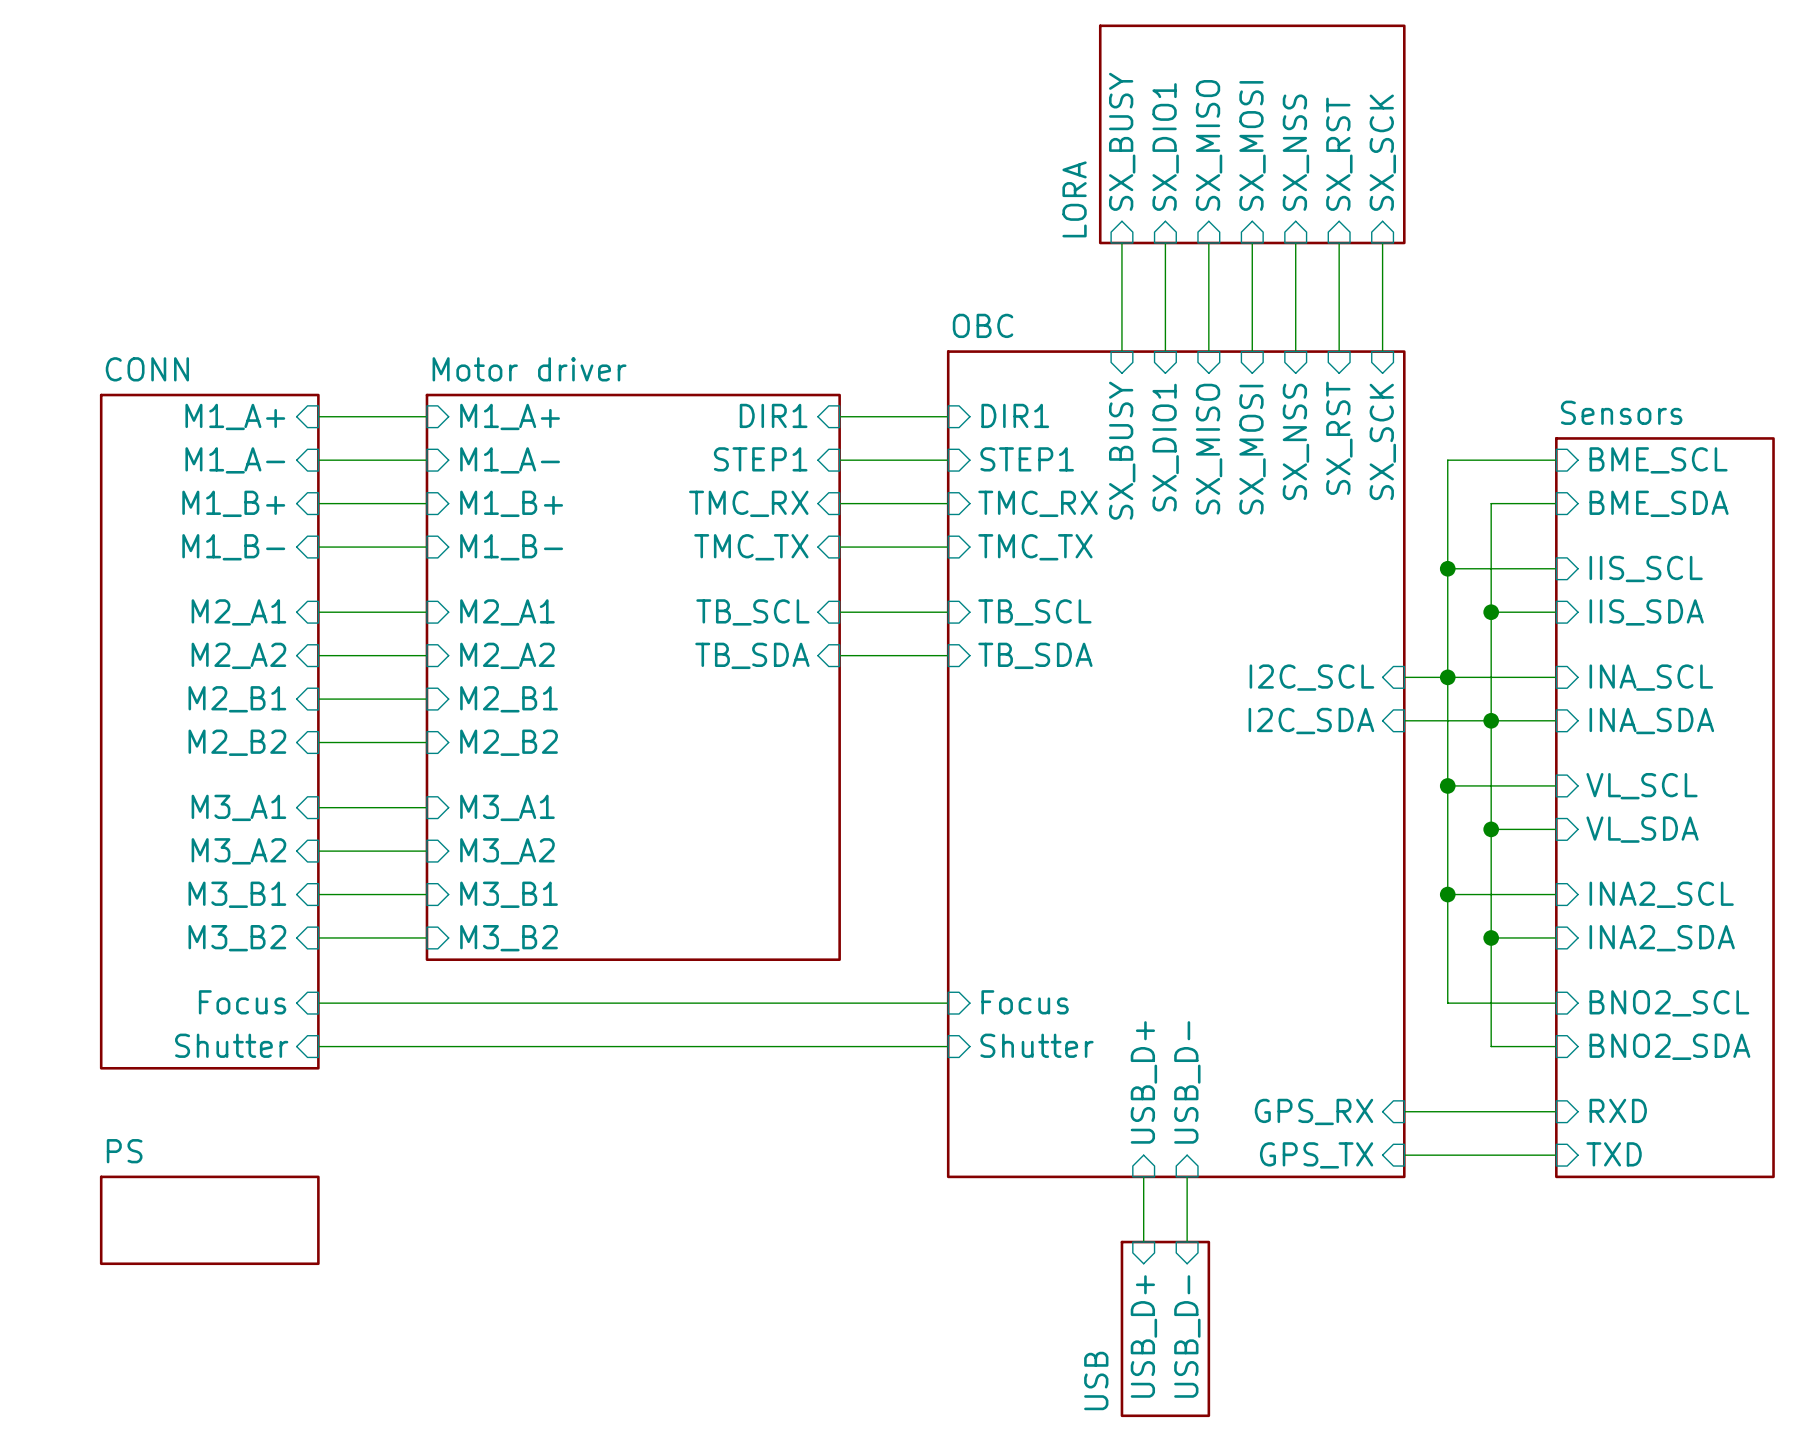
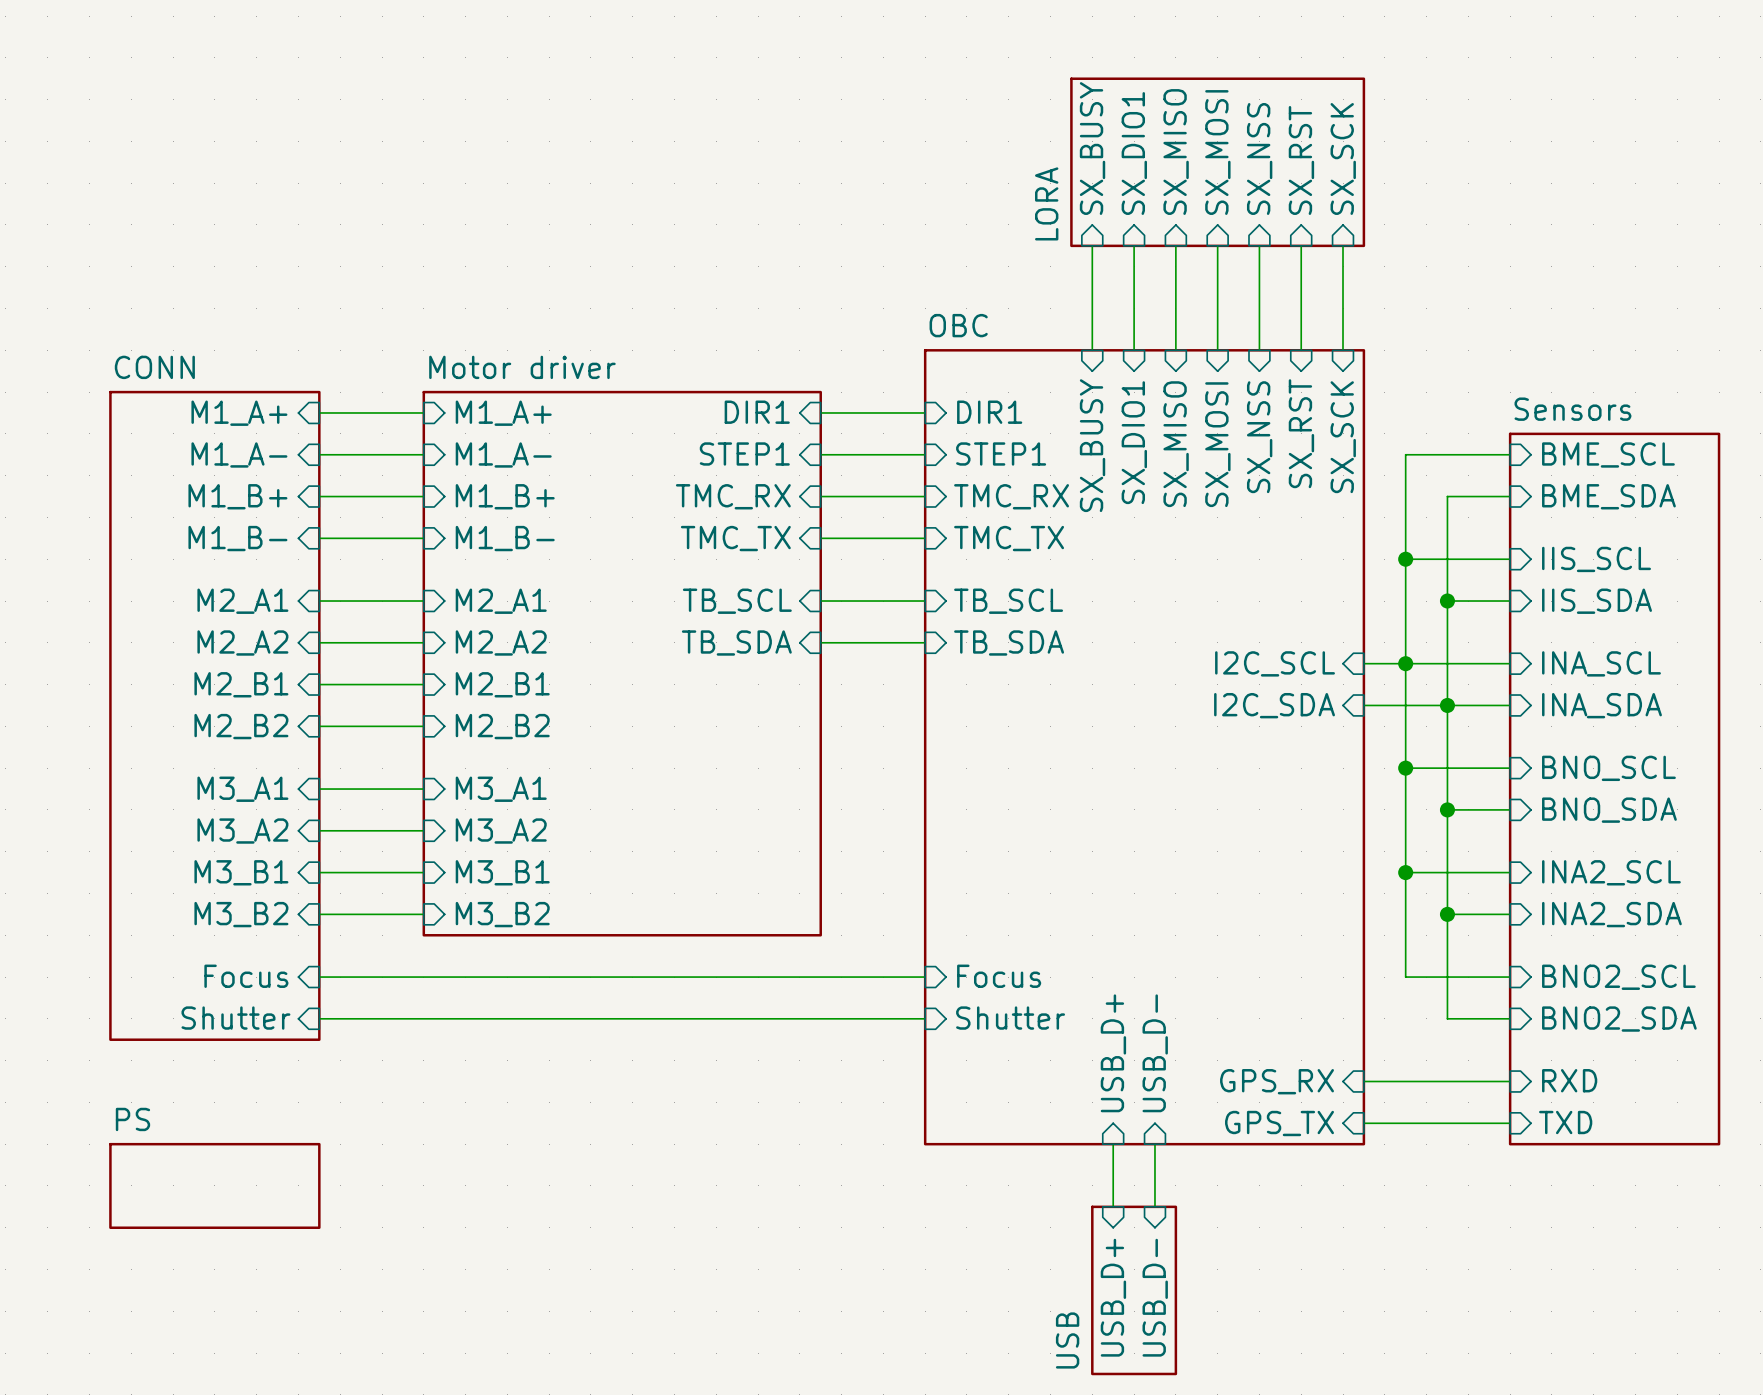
sheet LORA: (1252, 134) -> none
sheet LORA: none -> (1217, 162)
sheet pin: VL_SCL (1641, 786) -> BNO_SCL (1608, 768)
sheet pin: VL_SDA (1642, 829) -> BNO_SDA (1609, 810)

